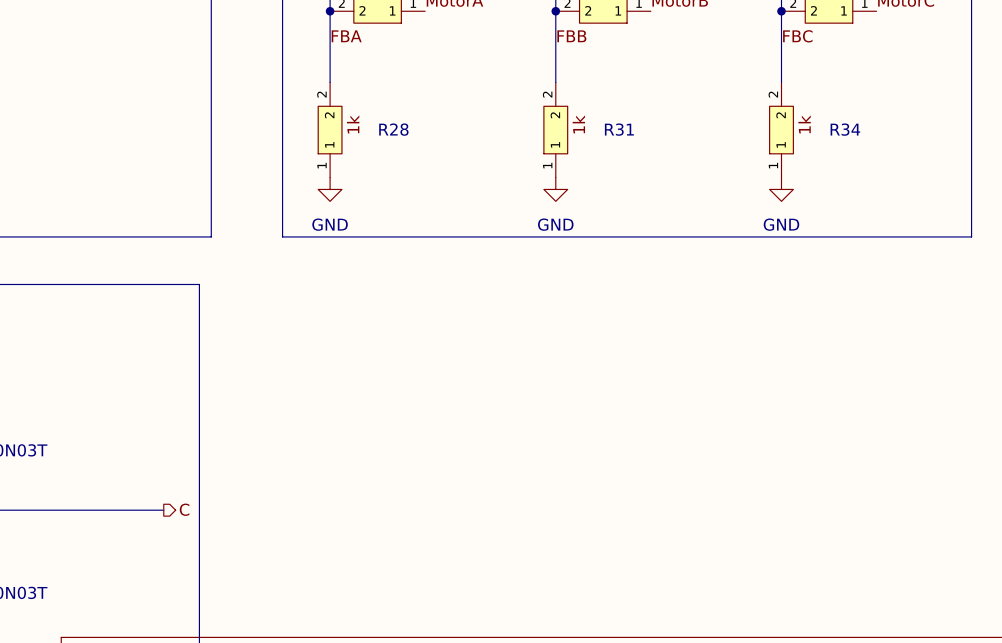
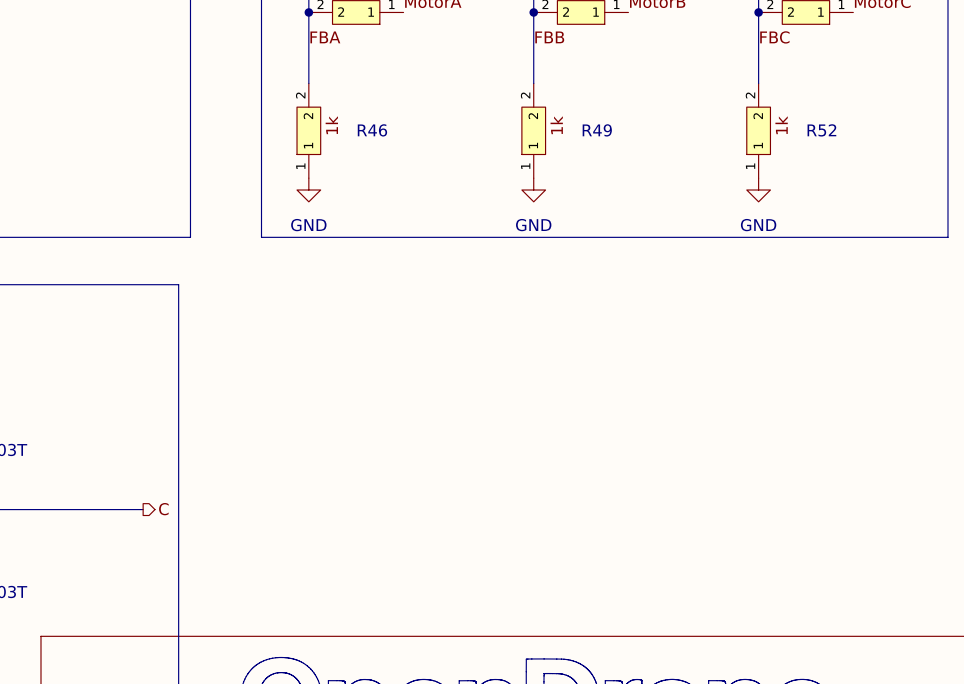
R28 name: R28 (393, 129) -> R46 (372, 130)
R31 name: R31 (619, 129) -> R49 (597, 130)
R34 name: R34 (845, 129) -> R52 (821, 130)

